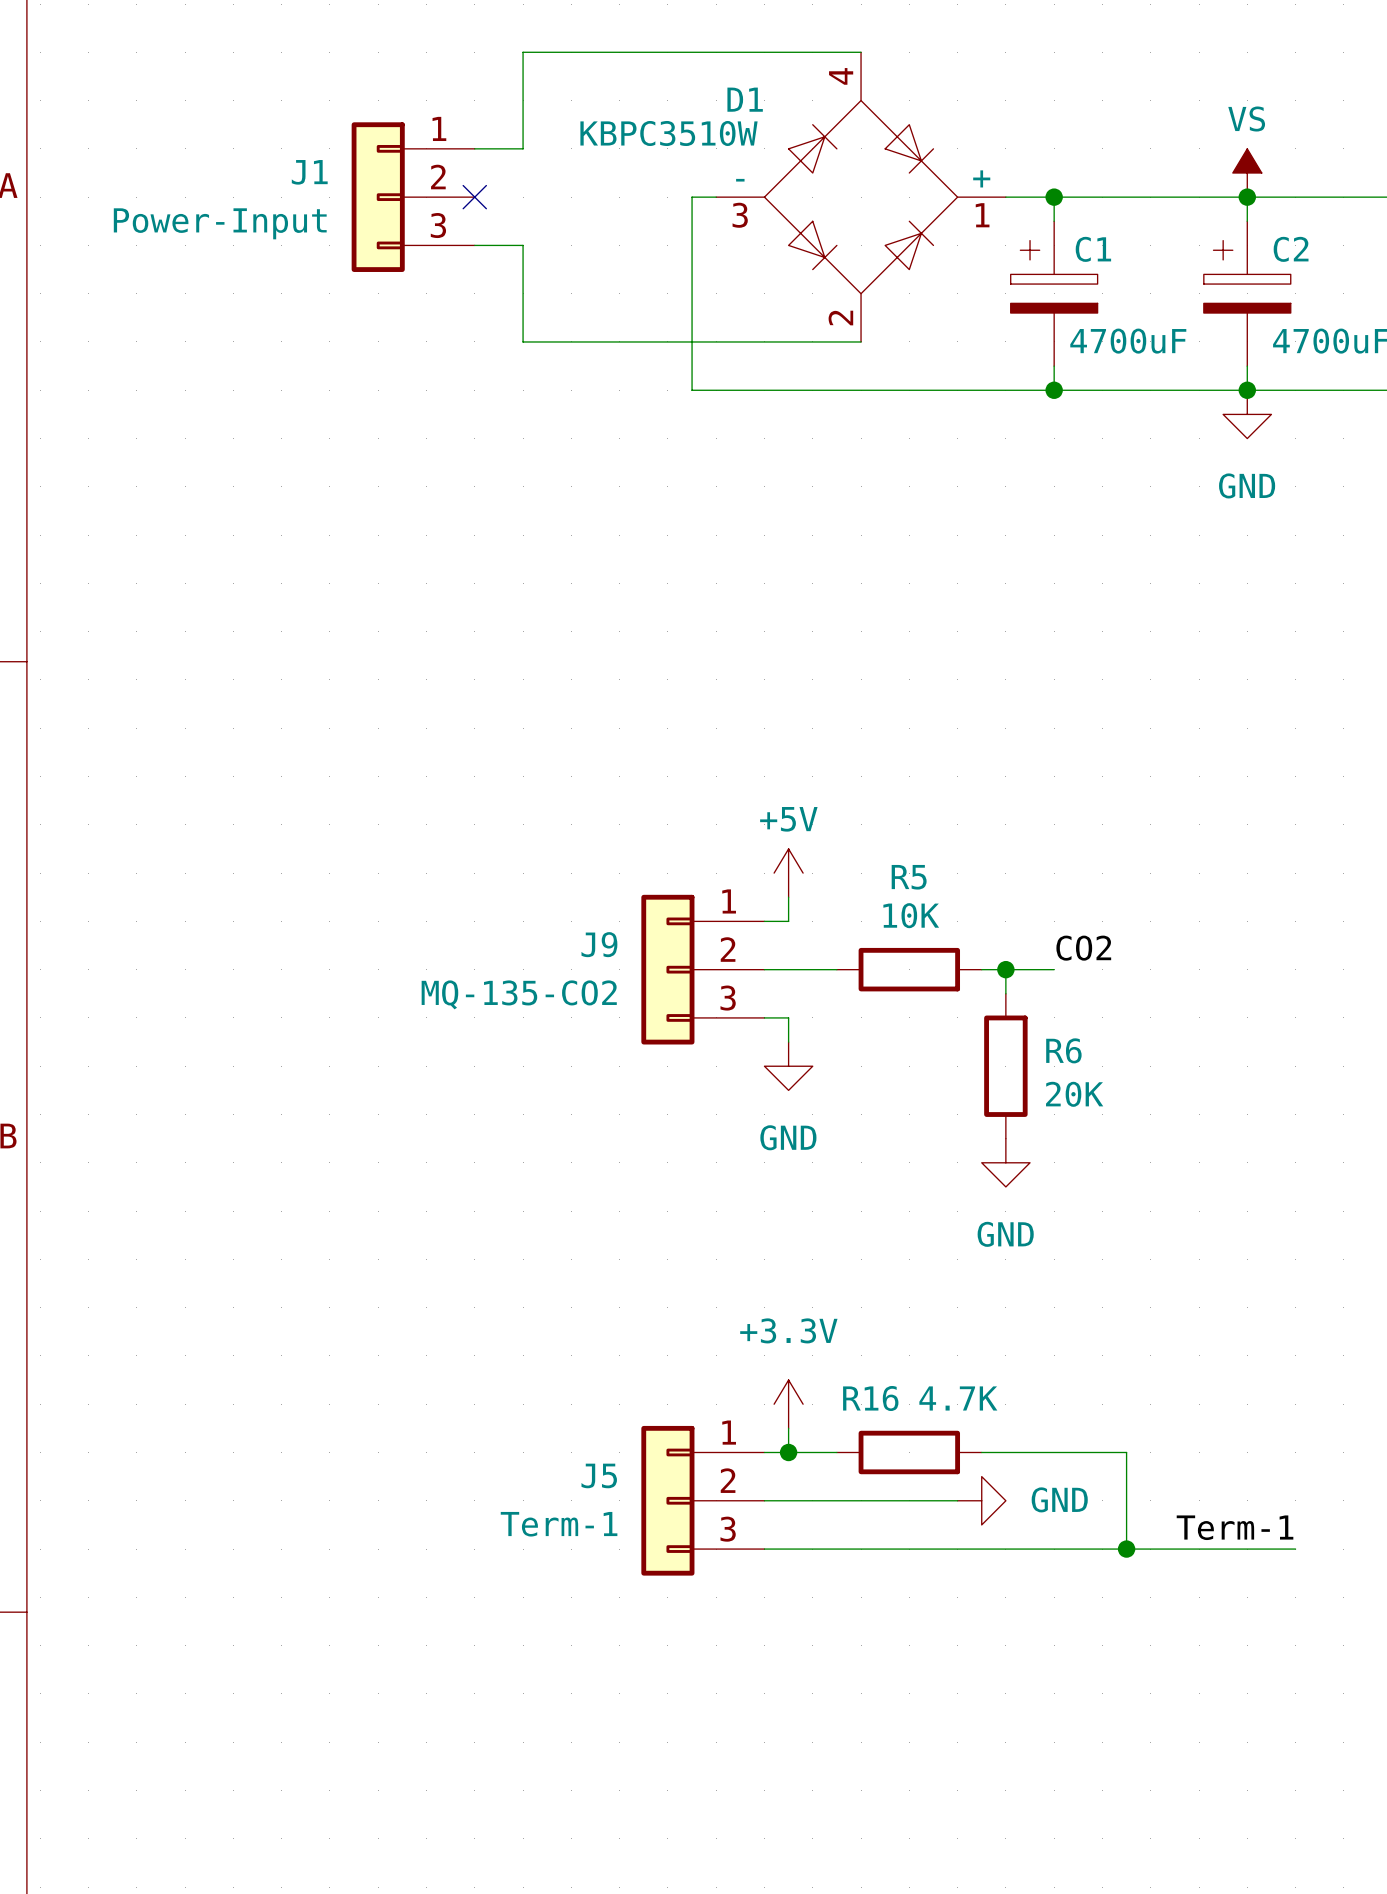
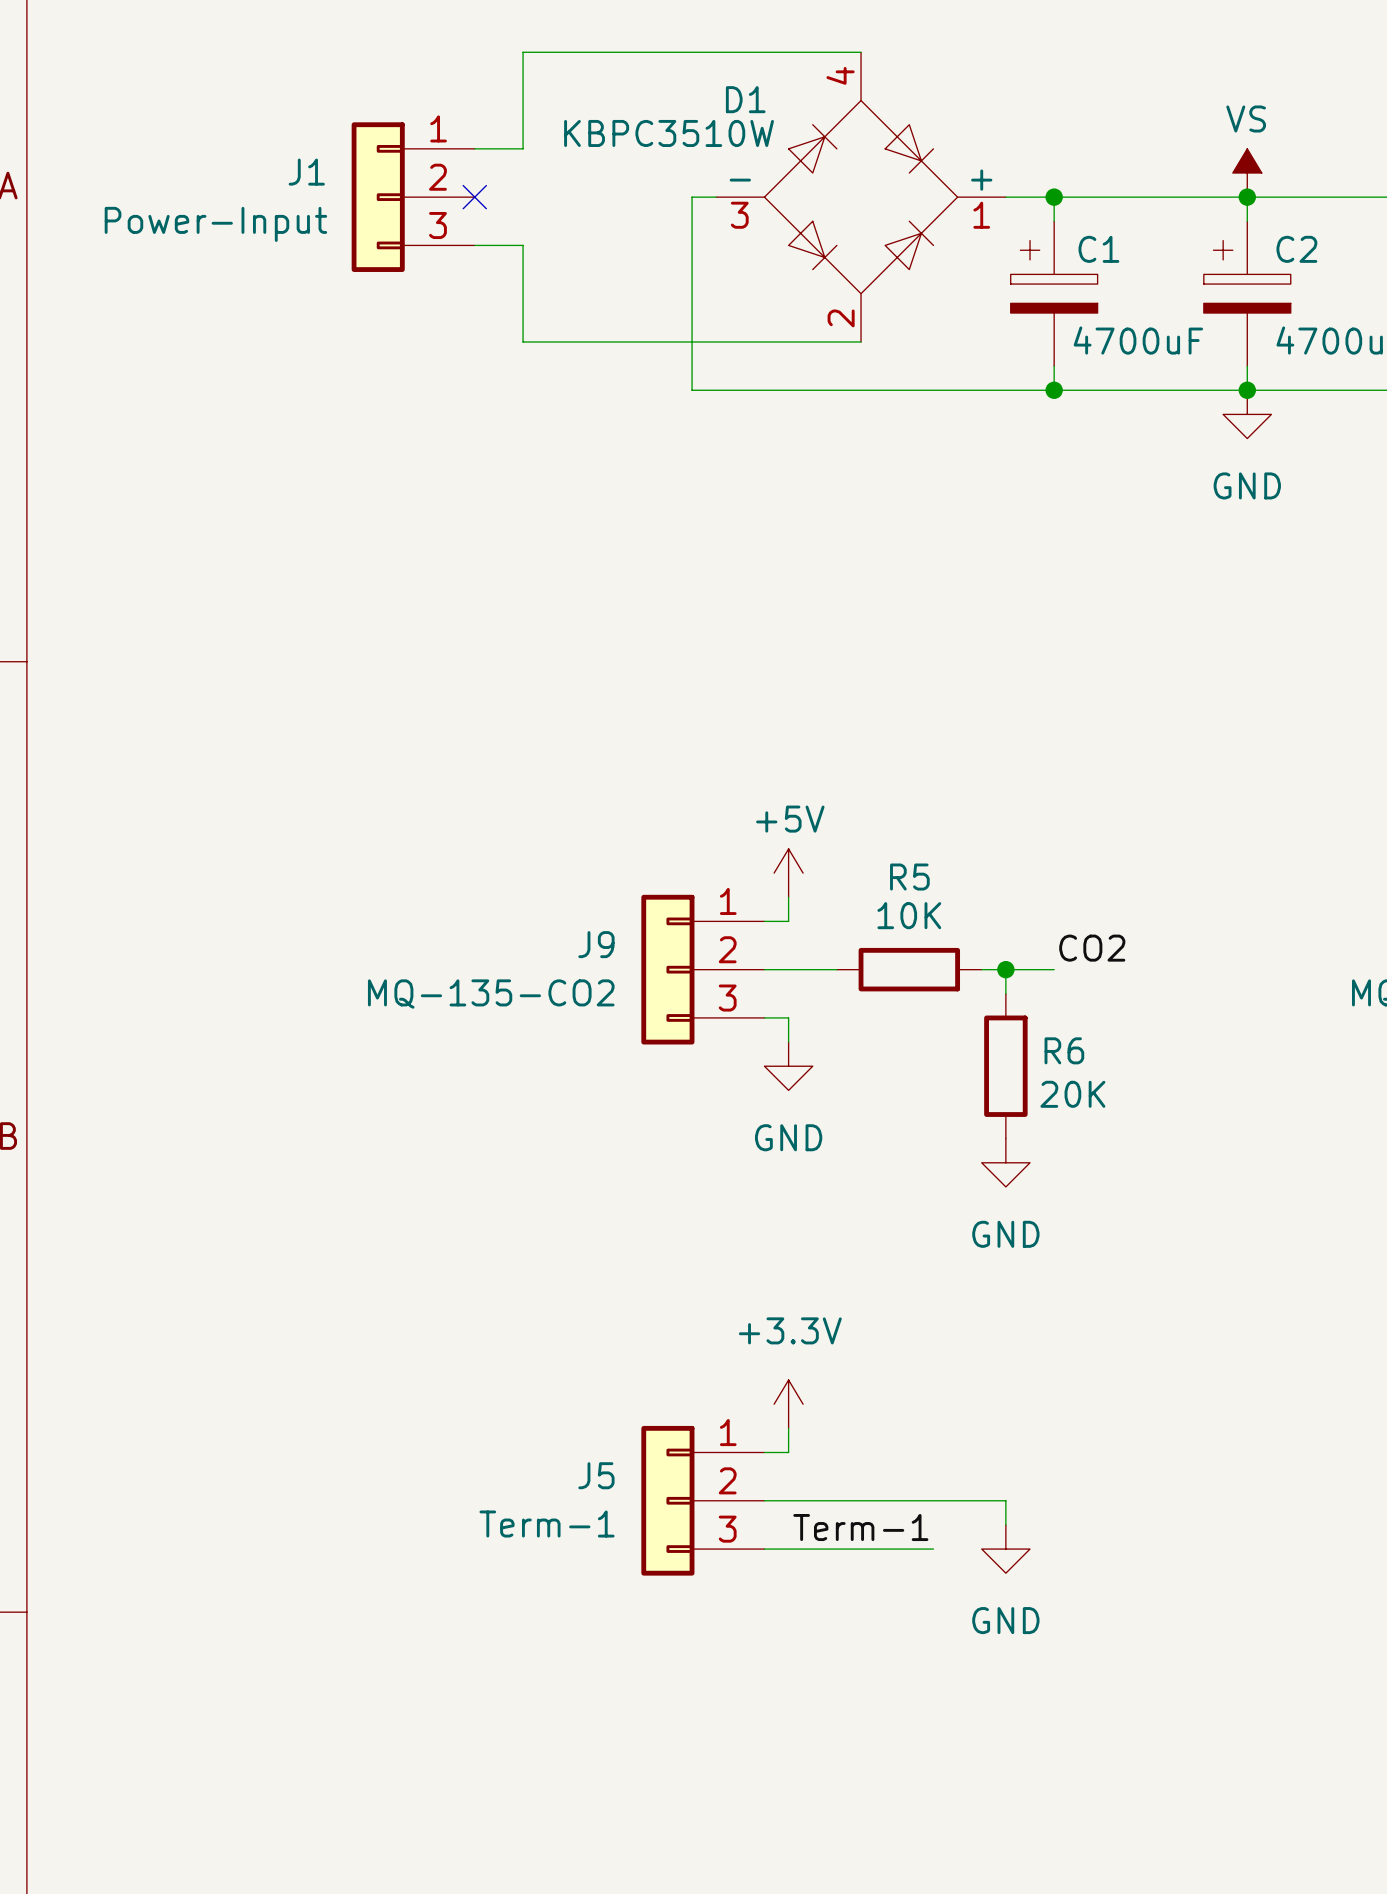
wire: (788, 1452) (836, 1452) -> none
junction: (788, 1452) -> none
R16: 4.7K (909, 1452) -> none
wire: (981, 1452) (1126, 1452) (1126, 1549) -> none
wire: none -> (957, 1500) (1005, 1500) (1005, 1524)
power symbol rotation: 0° (981, 1500) -> 90° clockwise (1005, 1549)
power symbol position: GND (981, 1500) -> GND (1005, 1549)
label position: Term-1 (1235, 1527) -> Term-1 (860, 1527)
wire: (933, 1549) (1295, 1549) -> none
junction: (1126, 1549) -> none

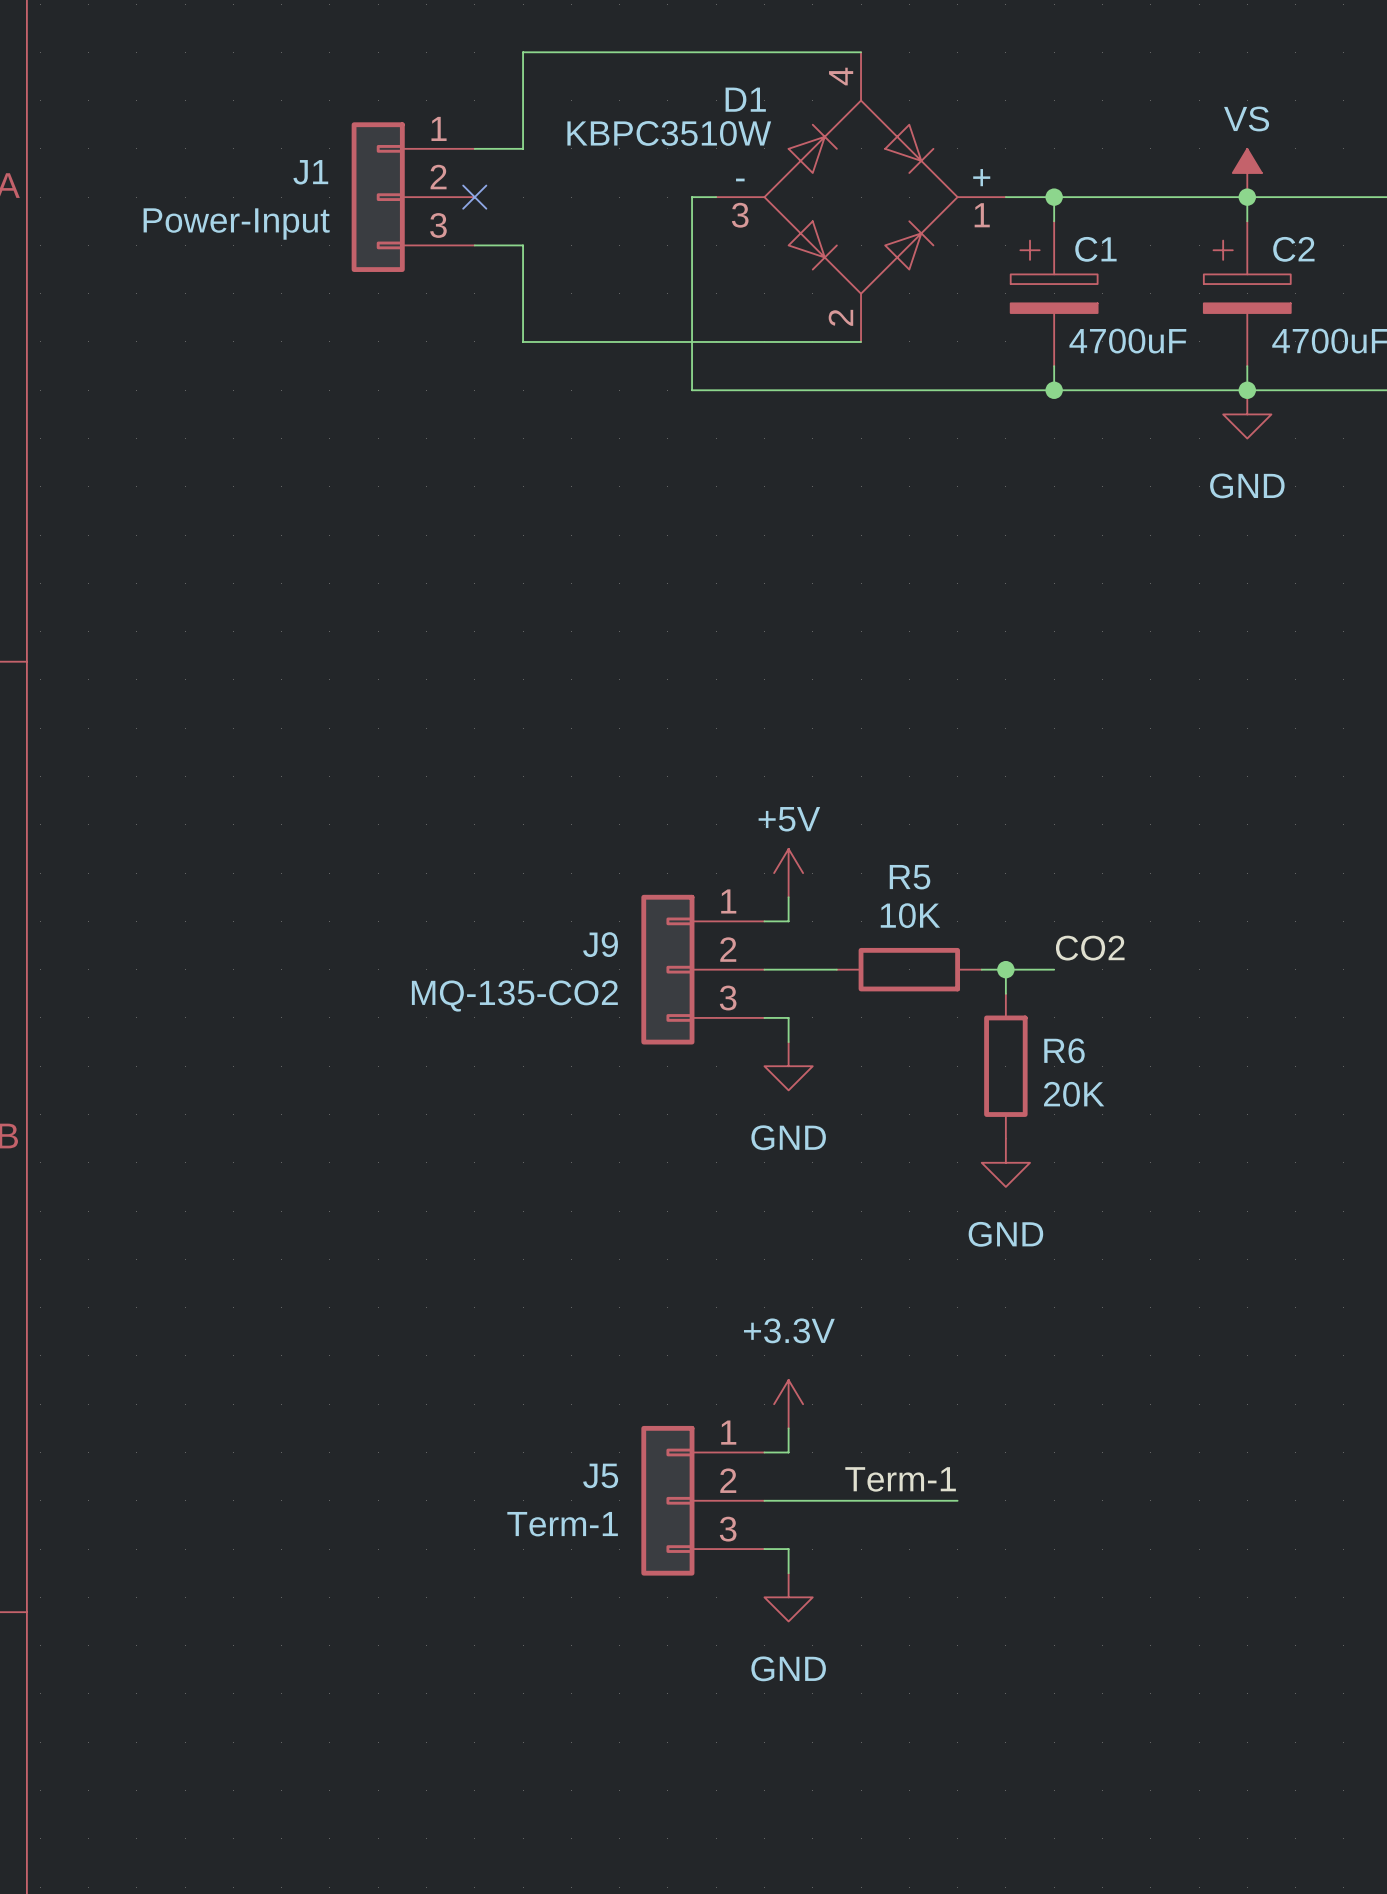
wire: (957, 1500) (1005, 1500) (1005, 1524) -> none
label position: Term-1 (860, 1527) -> Term-1 (900, 1479)
wire: (788, 1549) (933, 1549) -> (788, 1549) (788, 1573)
power symbol position: GND (1005, 1549) -> GND (788, 1597)

